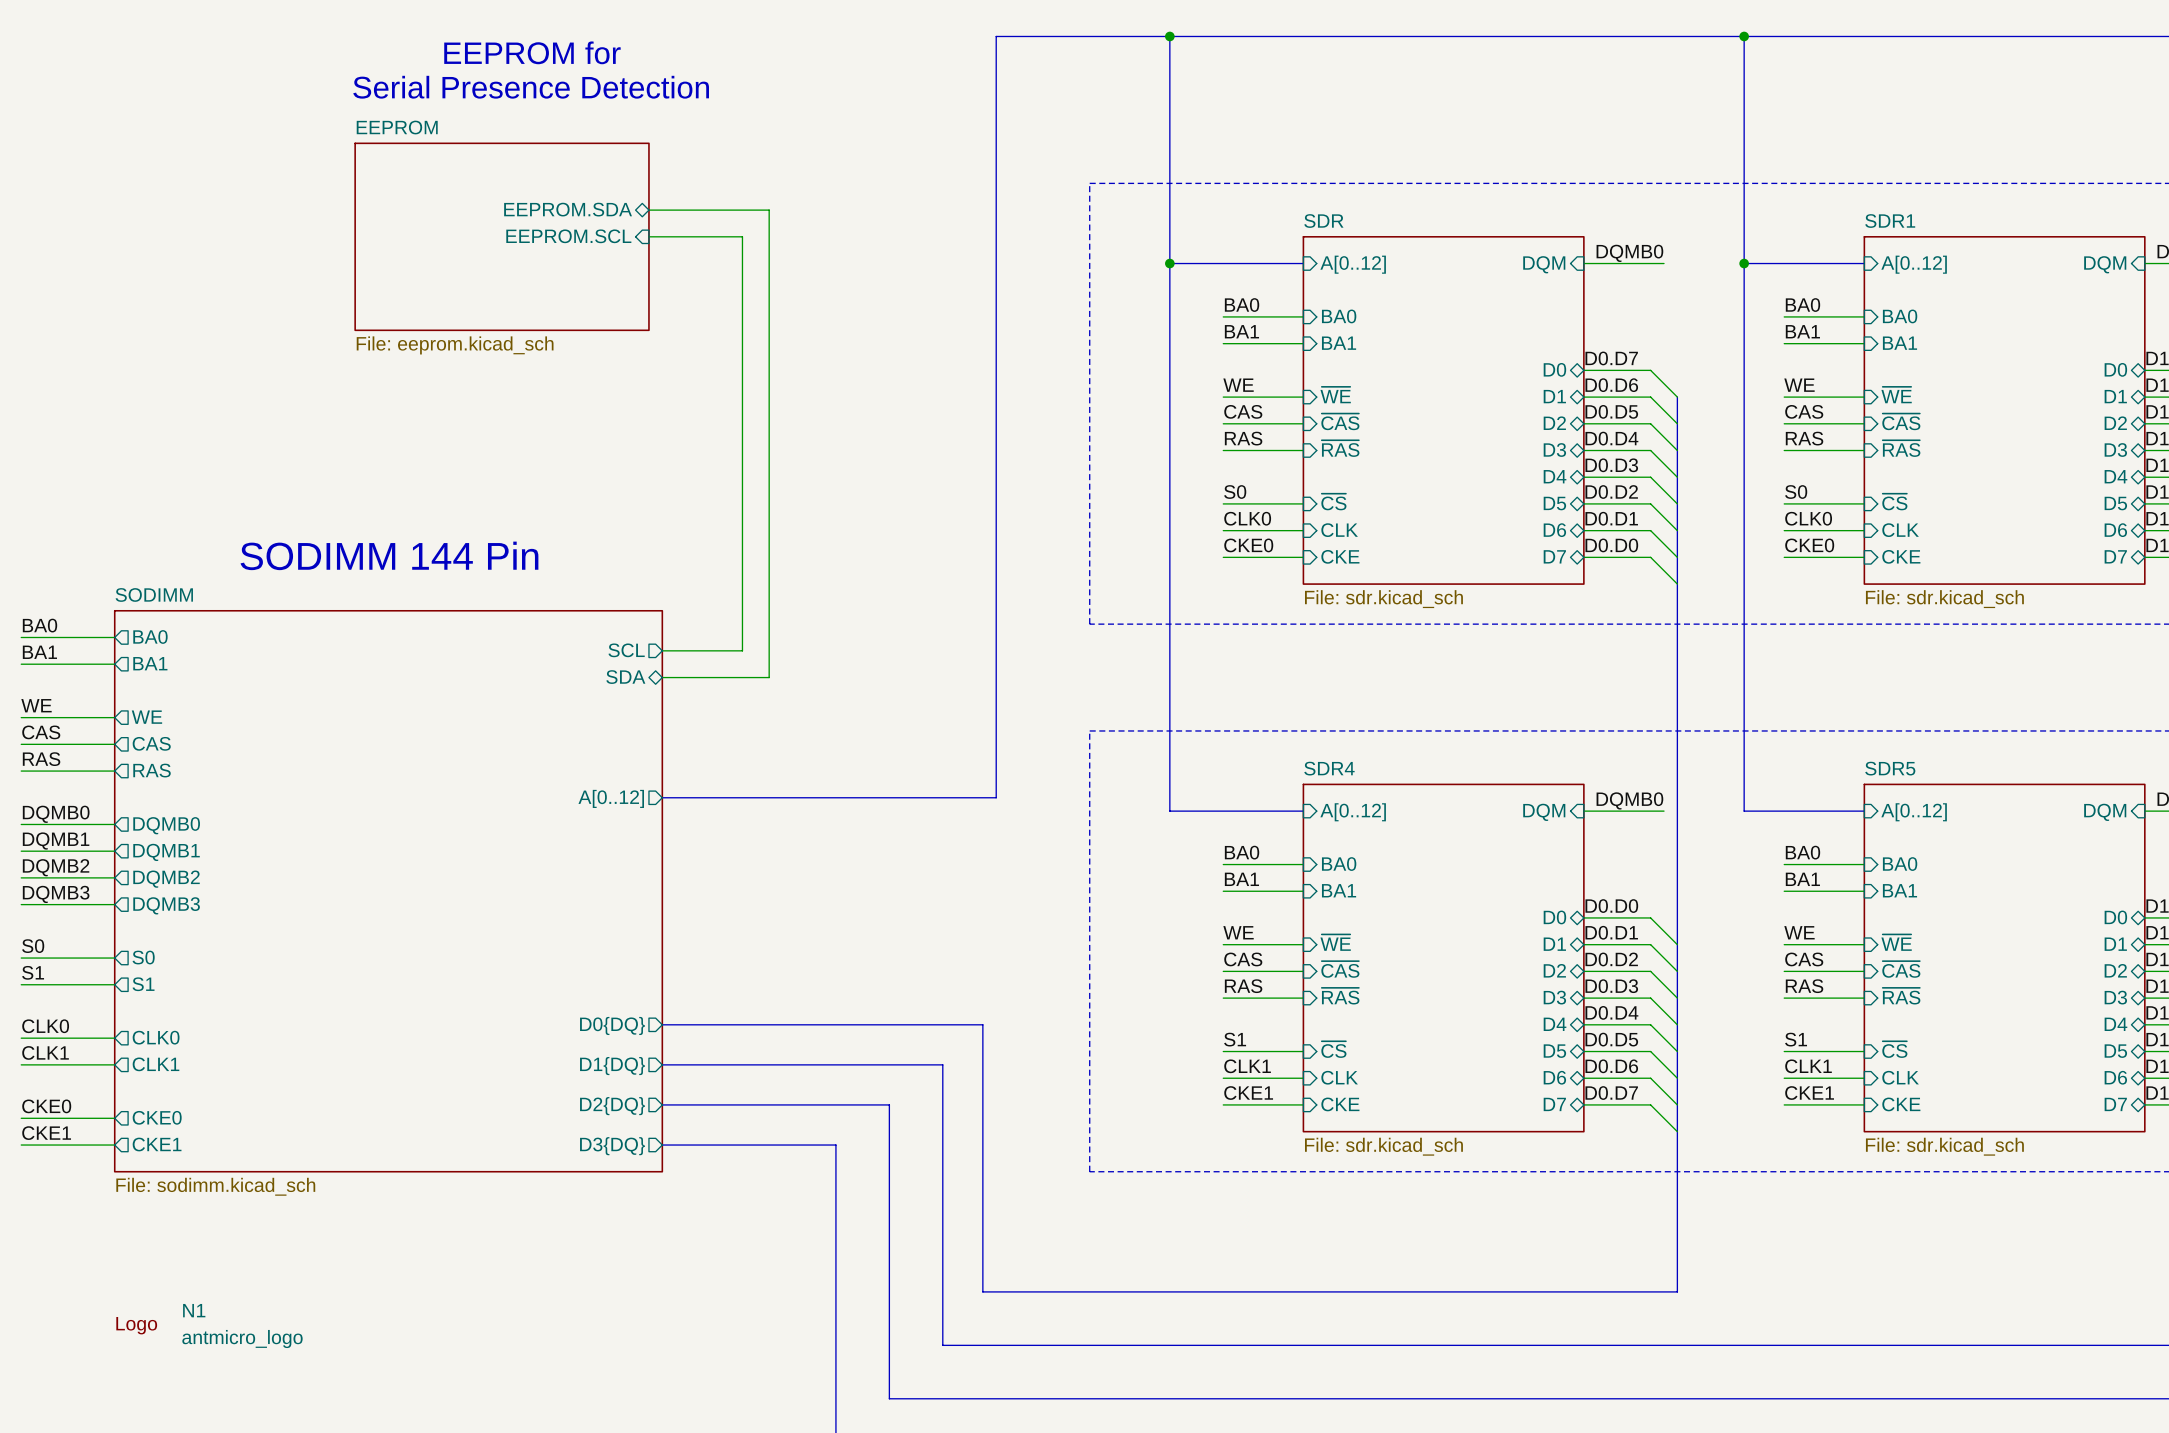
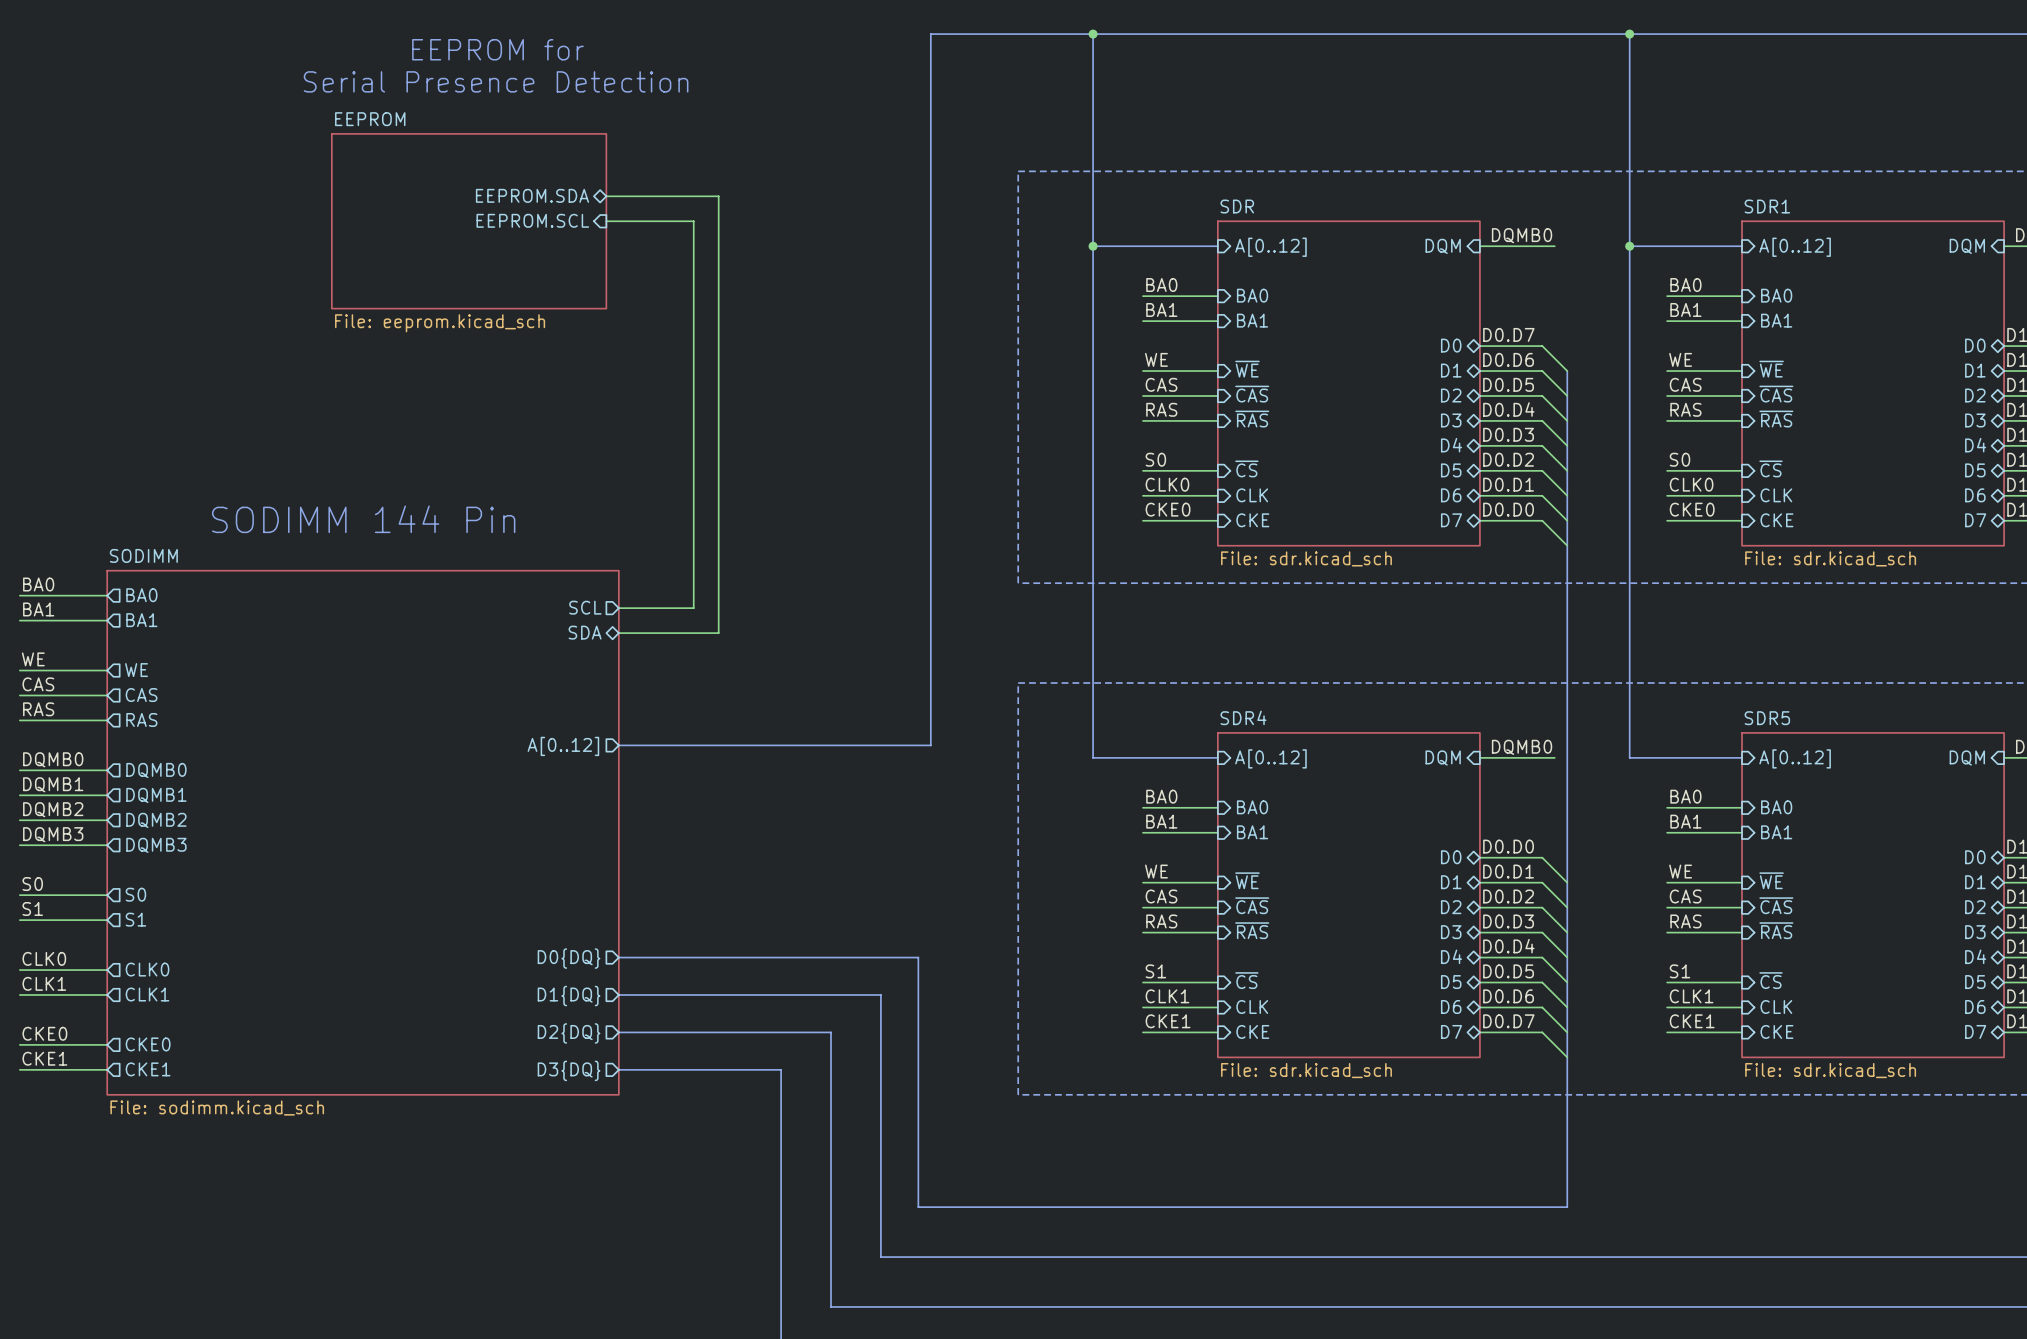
N1: antmicro_logo (209, 1326) -> none

